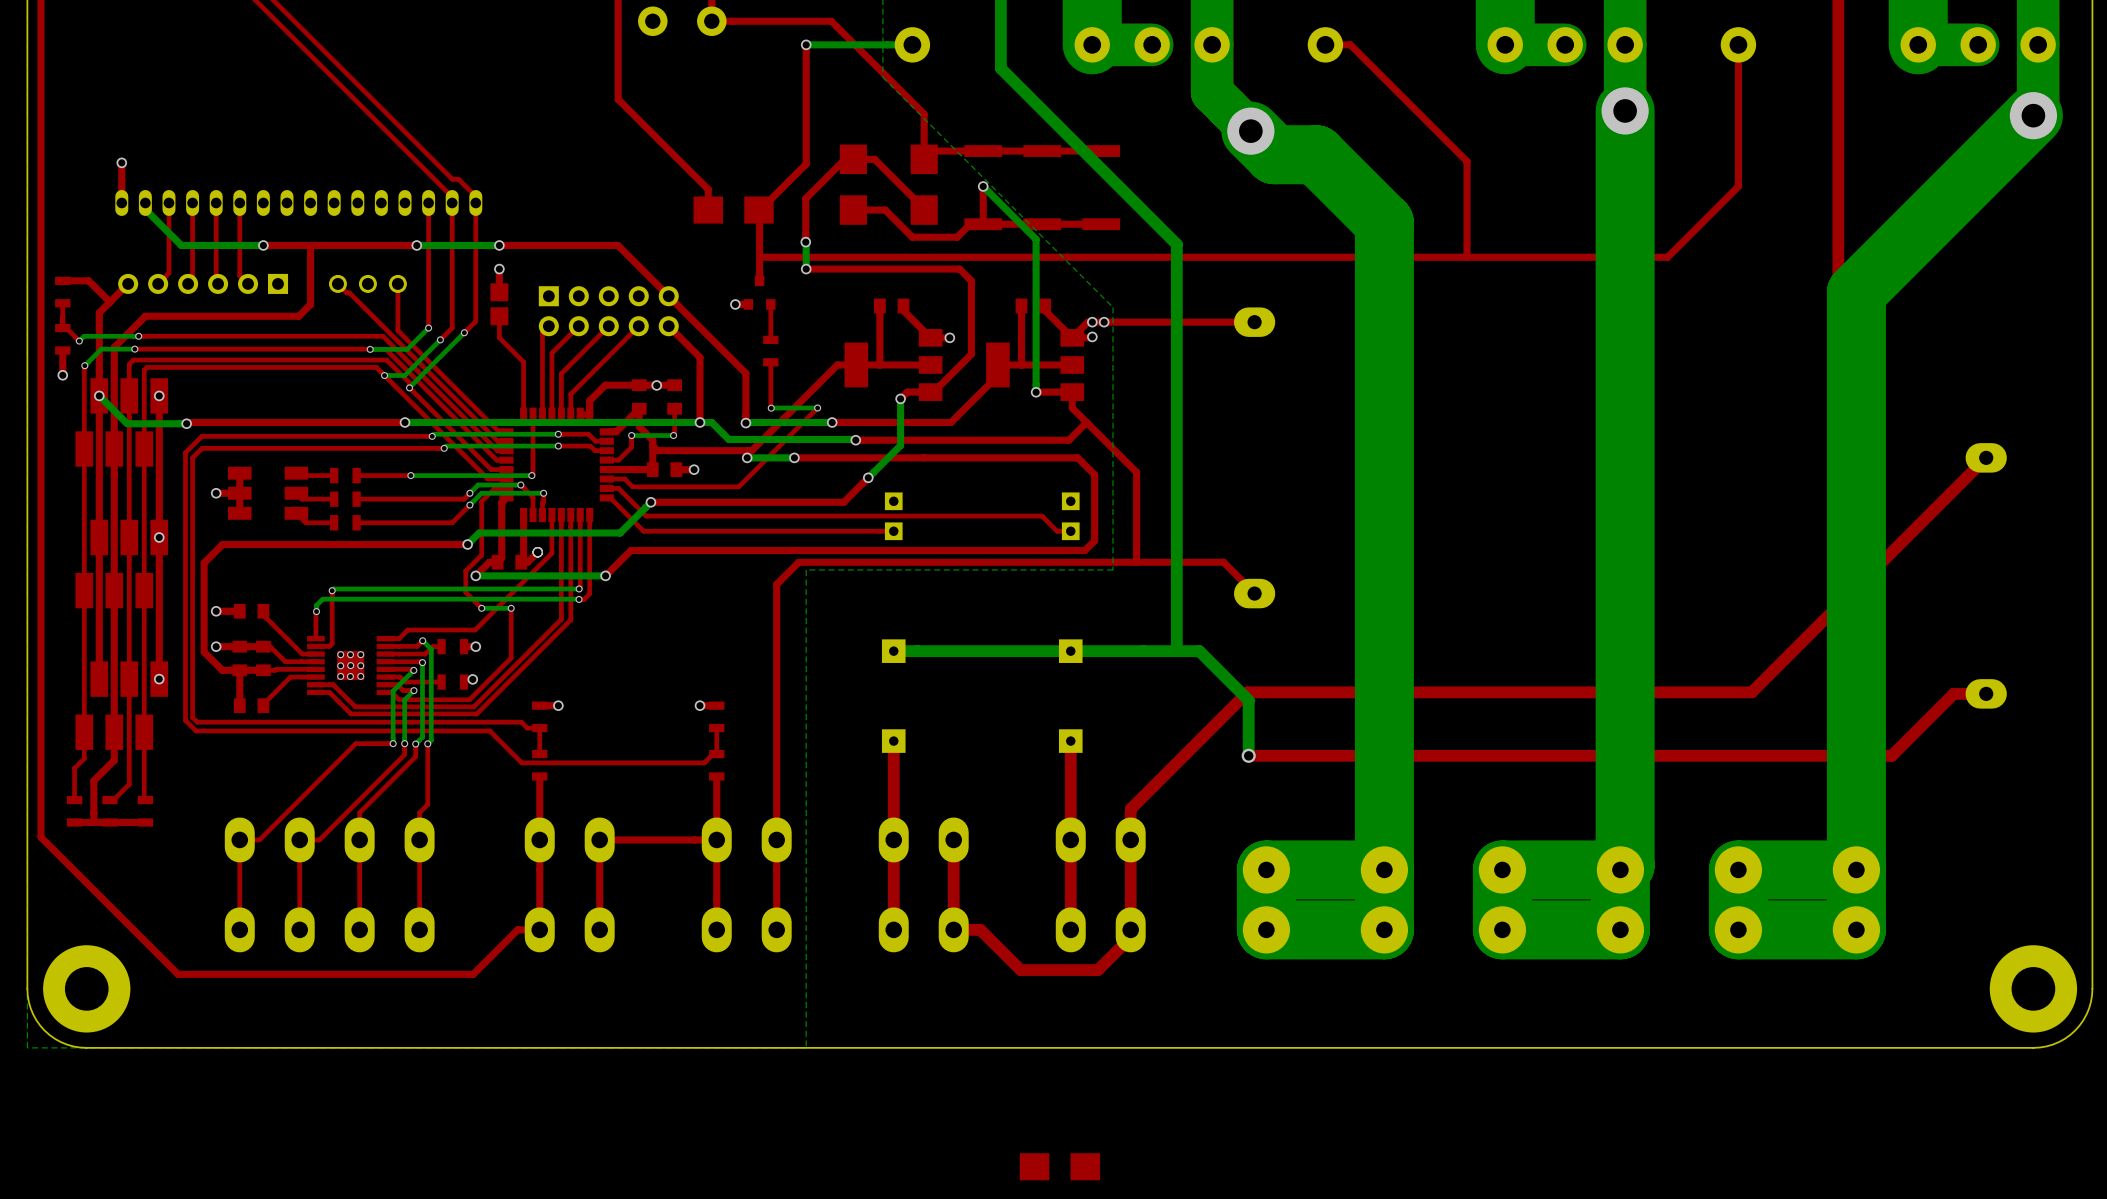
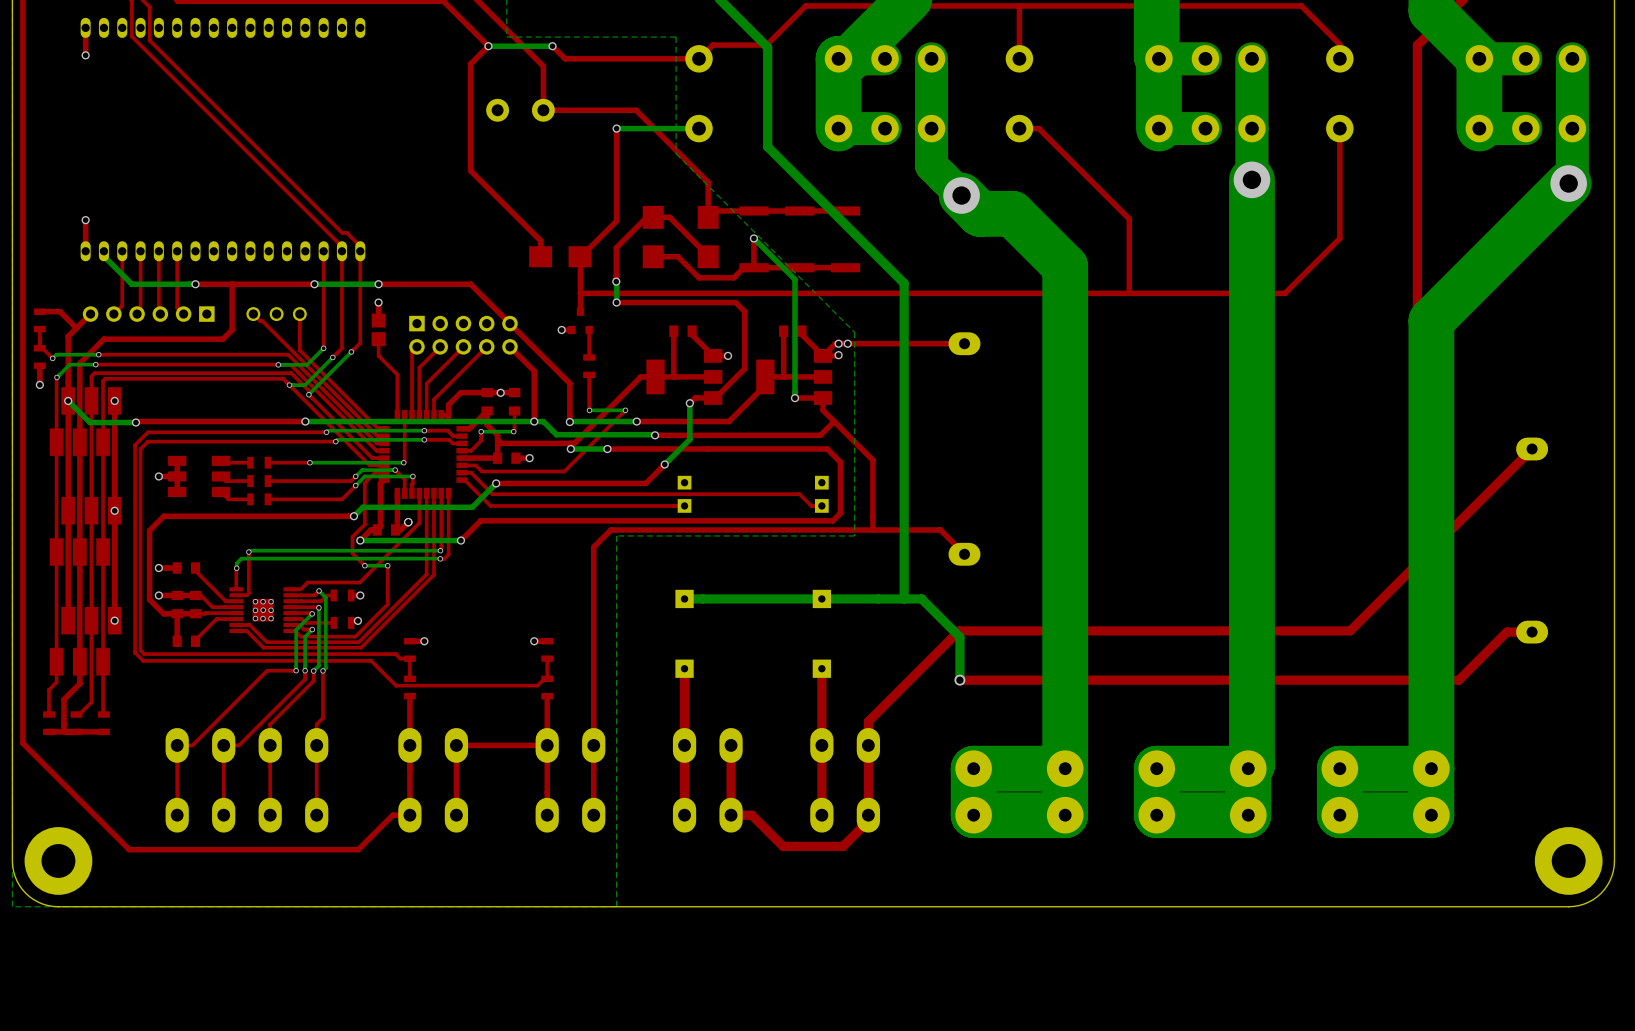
part: (1059, 1166) -> none

